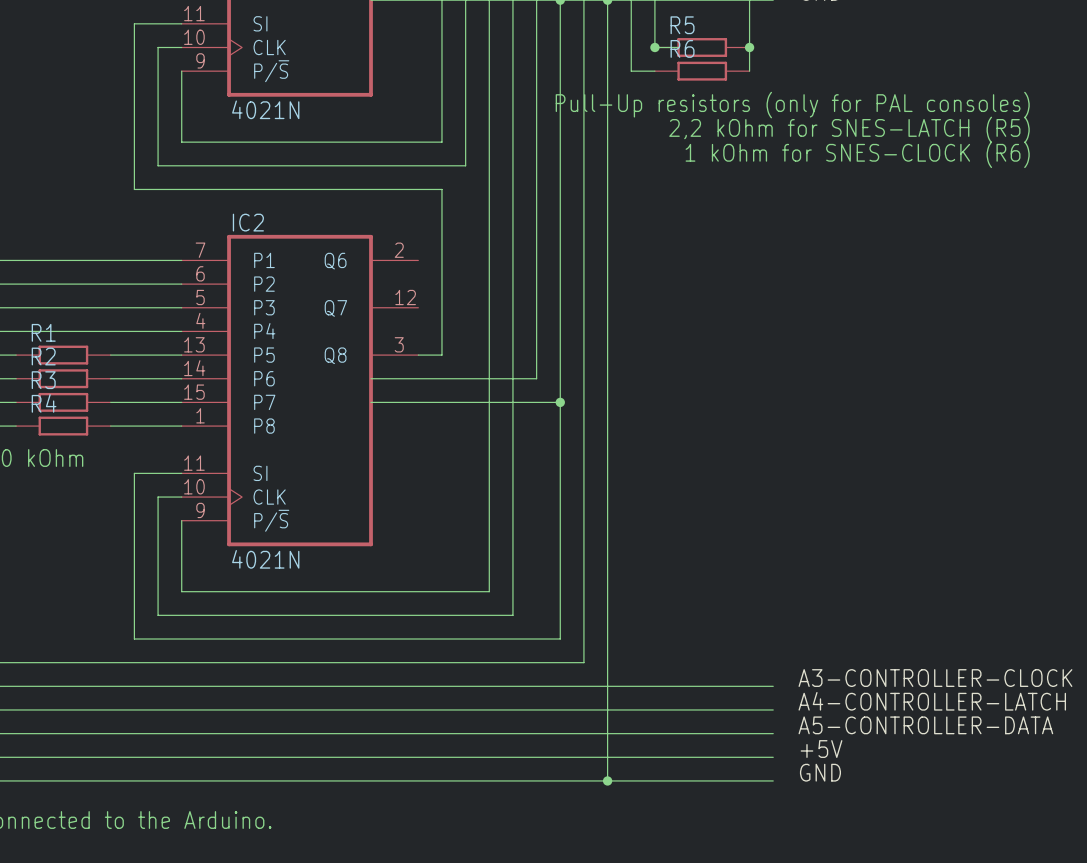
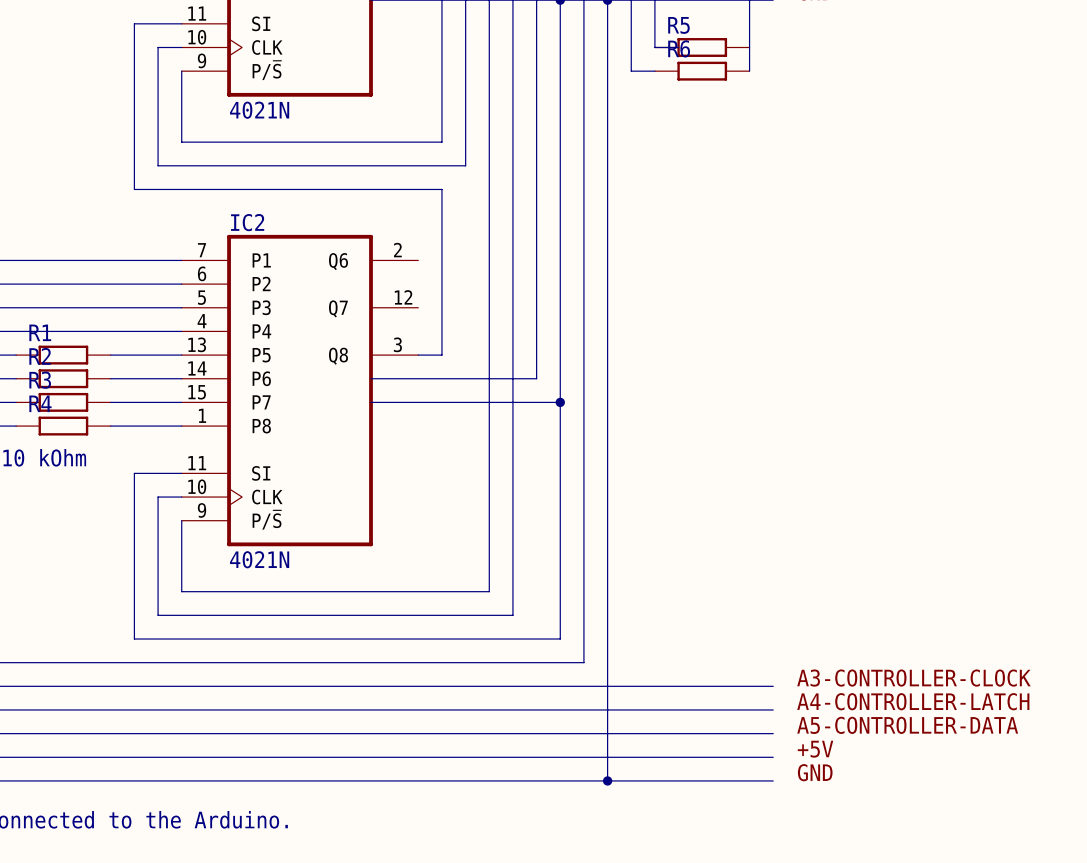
junction: (654, 47) -> none
junction: (749, 47) -> none
text: Pull-Up resistors (only for PAL consoles) (792, 105) -> none
text: 2,2 kOhm for SNES-LATCH (R5) (849, 129) -> none
text: 1 kOhm for SNES-CLOCK (R6) (857, 154) -> none

